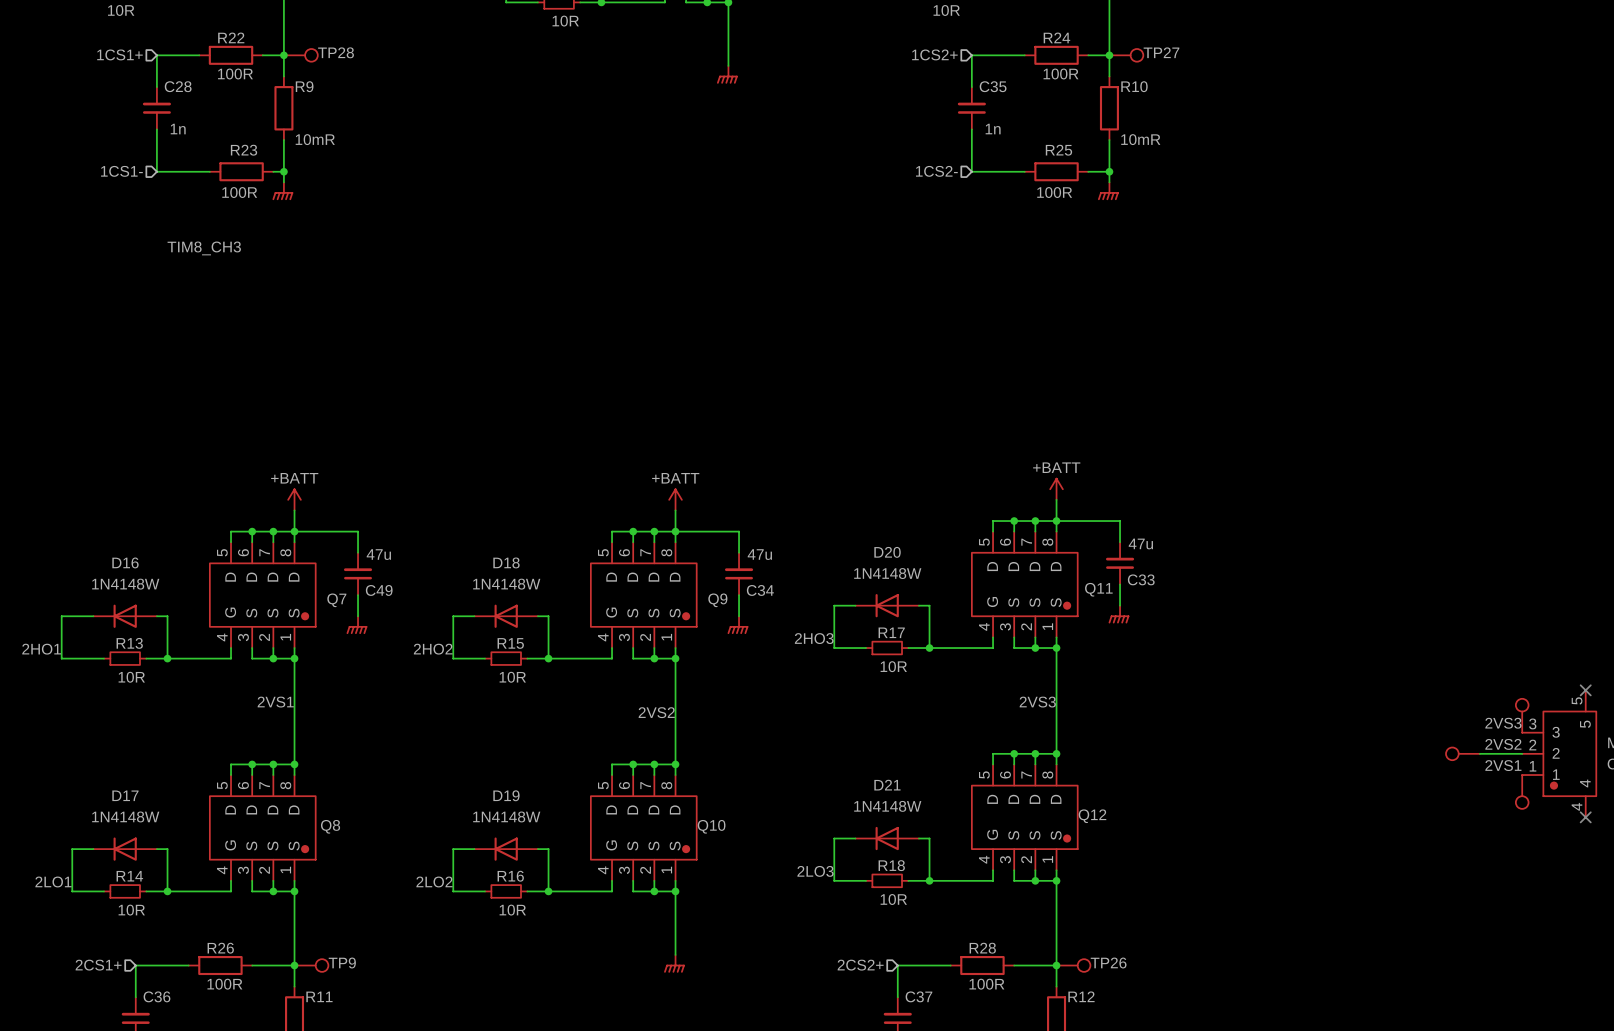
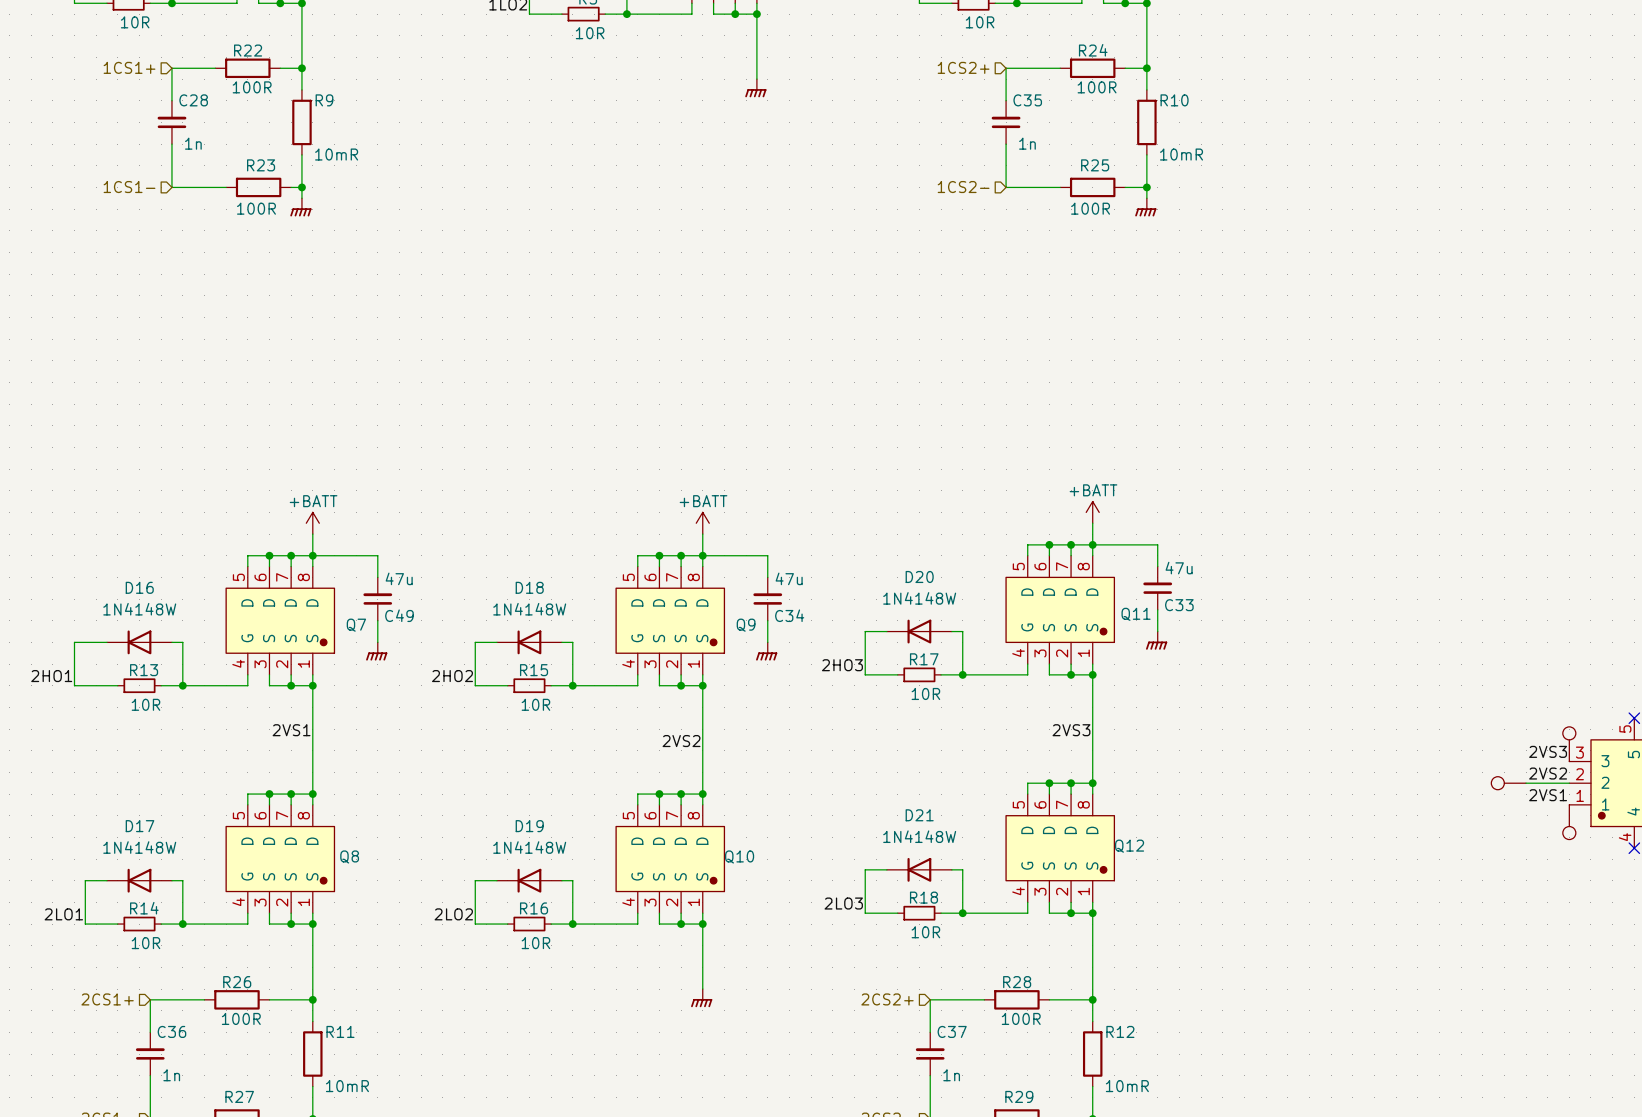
TP28: (300, 55) -> none
TP27: (1126, 55) -> none
label: TIM8_CH3 (204, 248) -> none
TP9: (311, 965) -> none
TP26: (1073, 965) -> none

